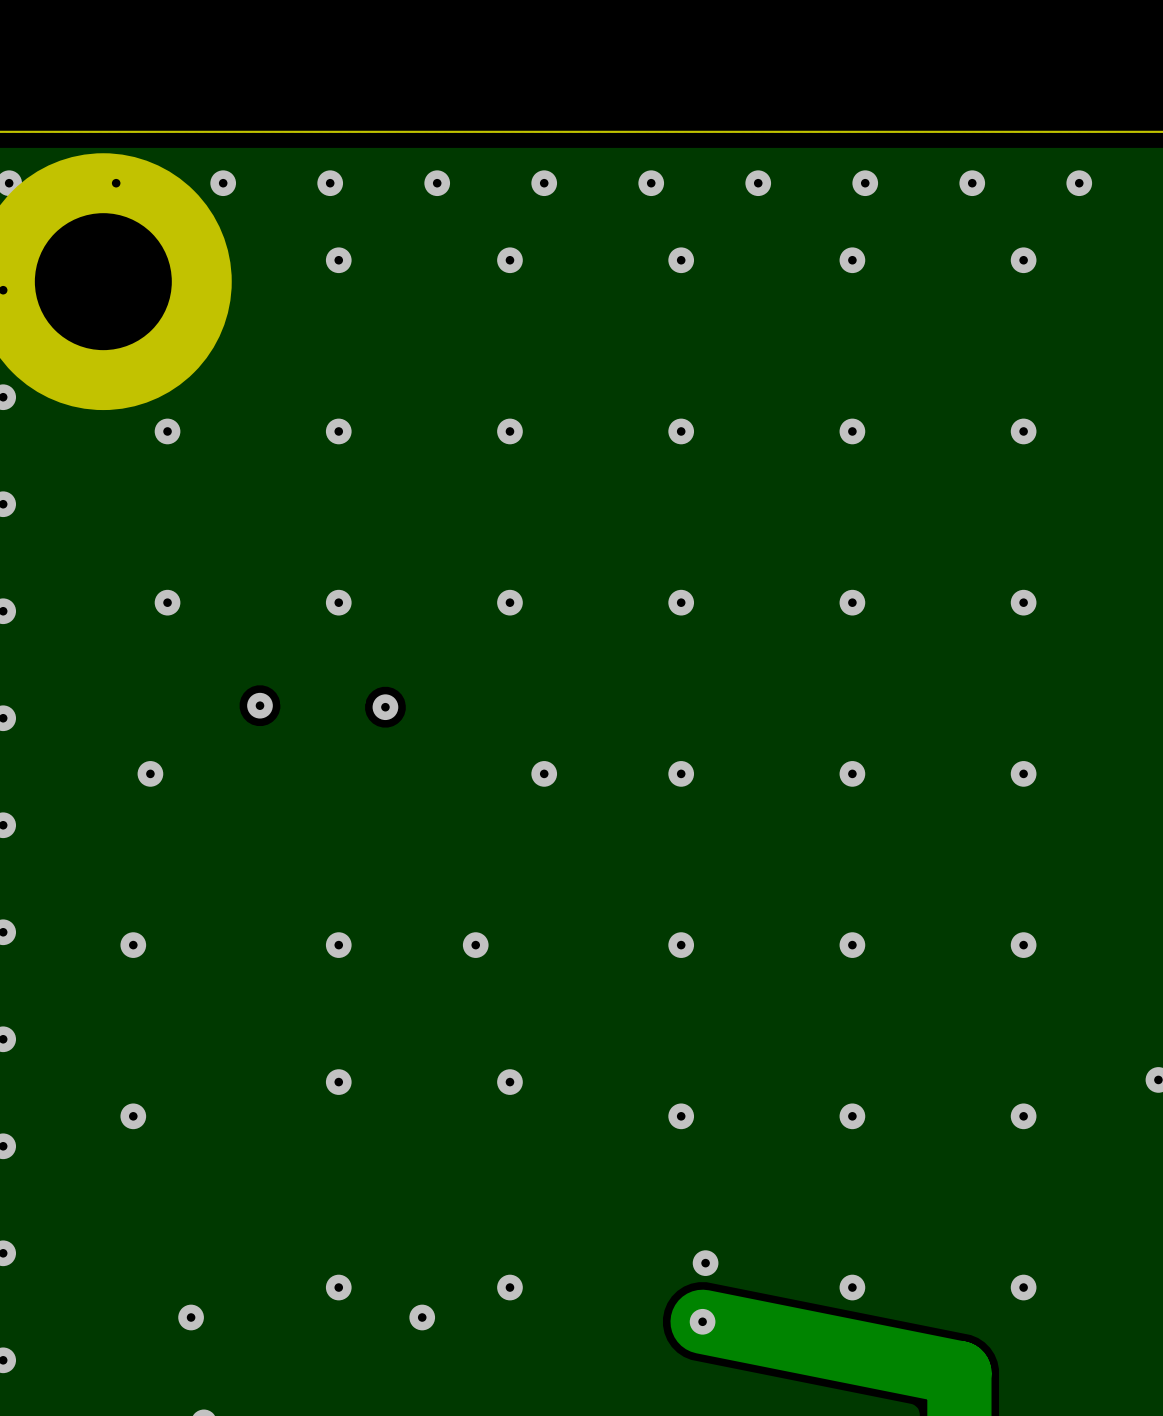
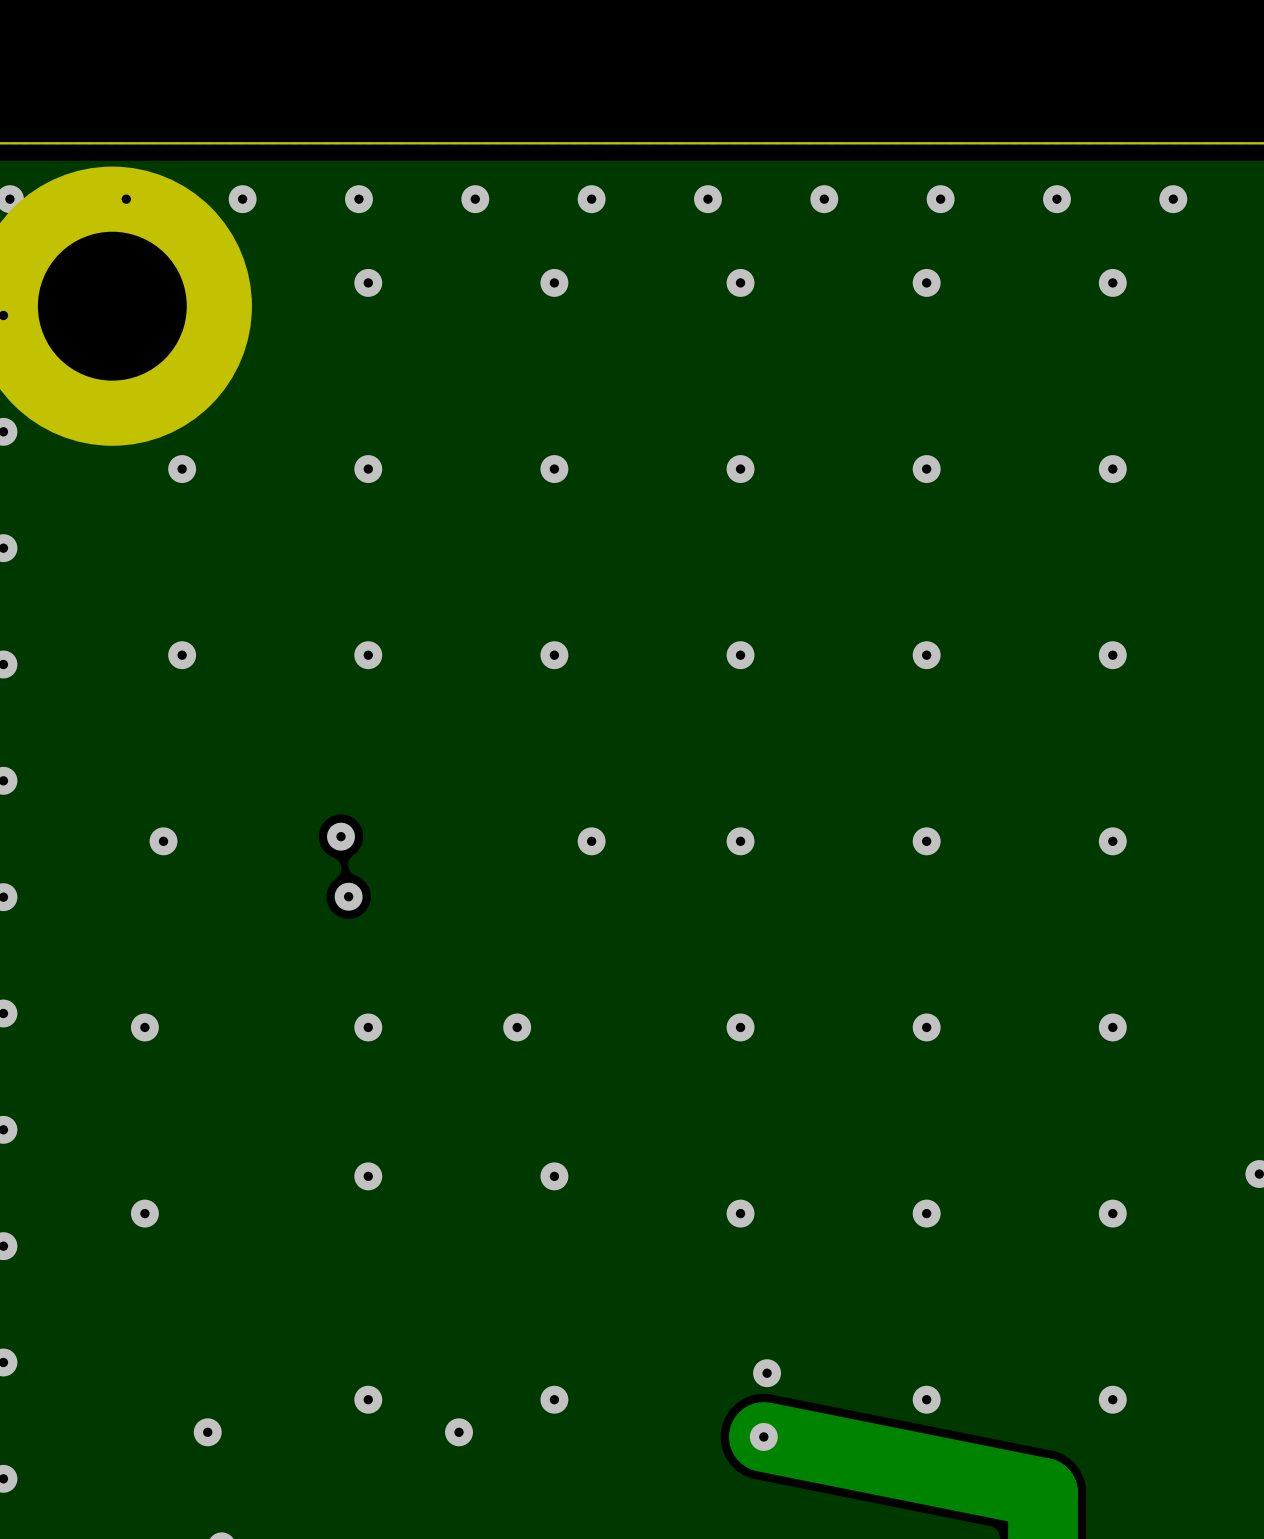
via: (259, 705) -> none
via: (385, 707) -> none
via: none -> (341, 836)
via: none -> (348, 896)

